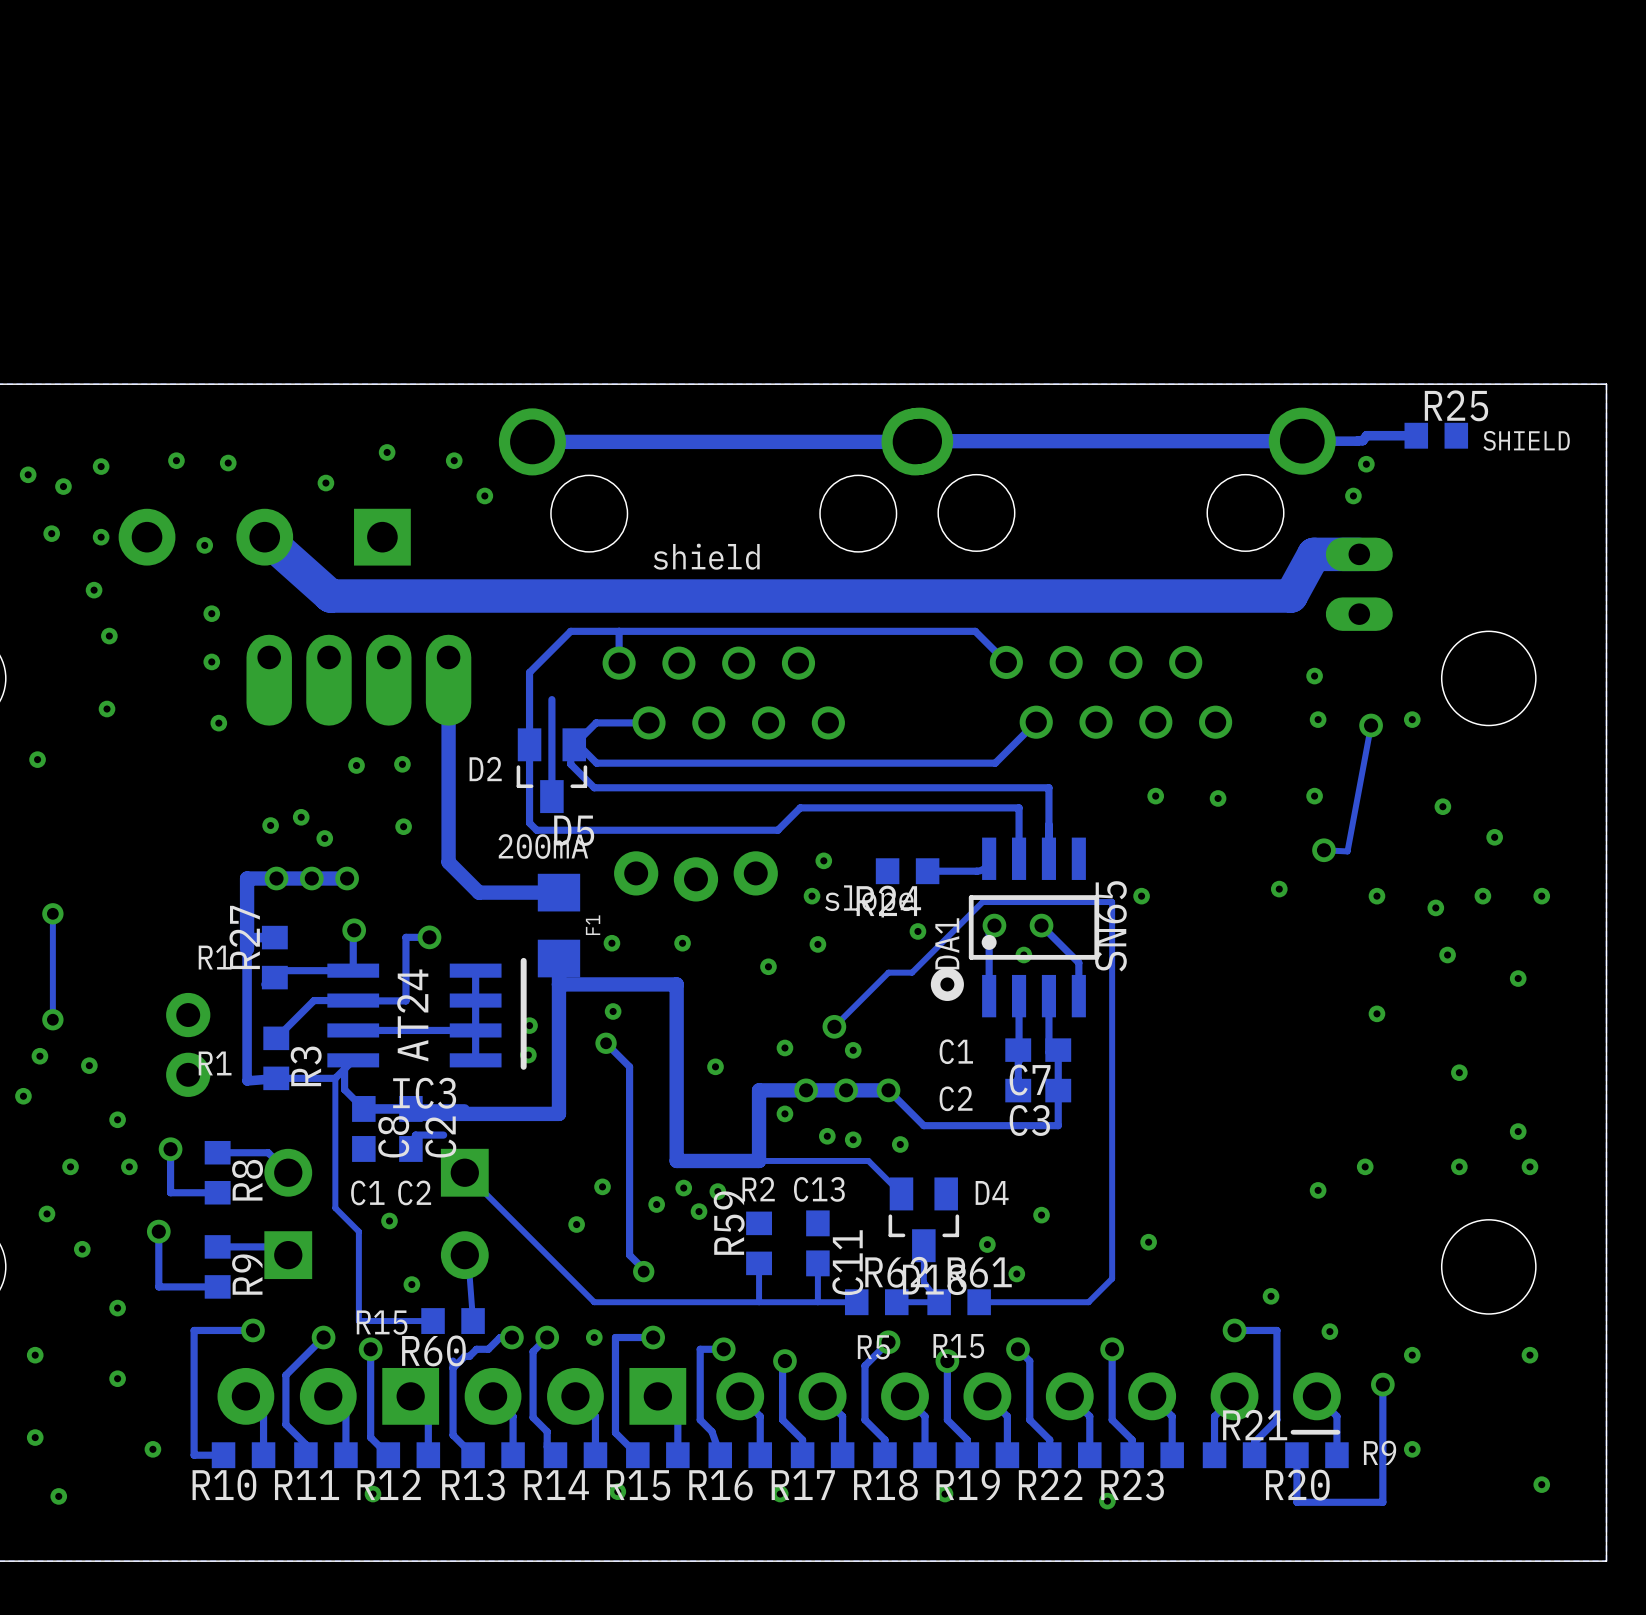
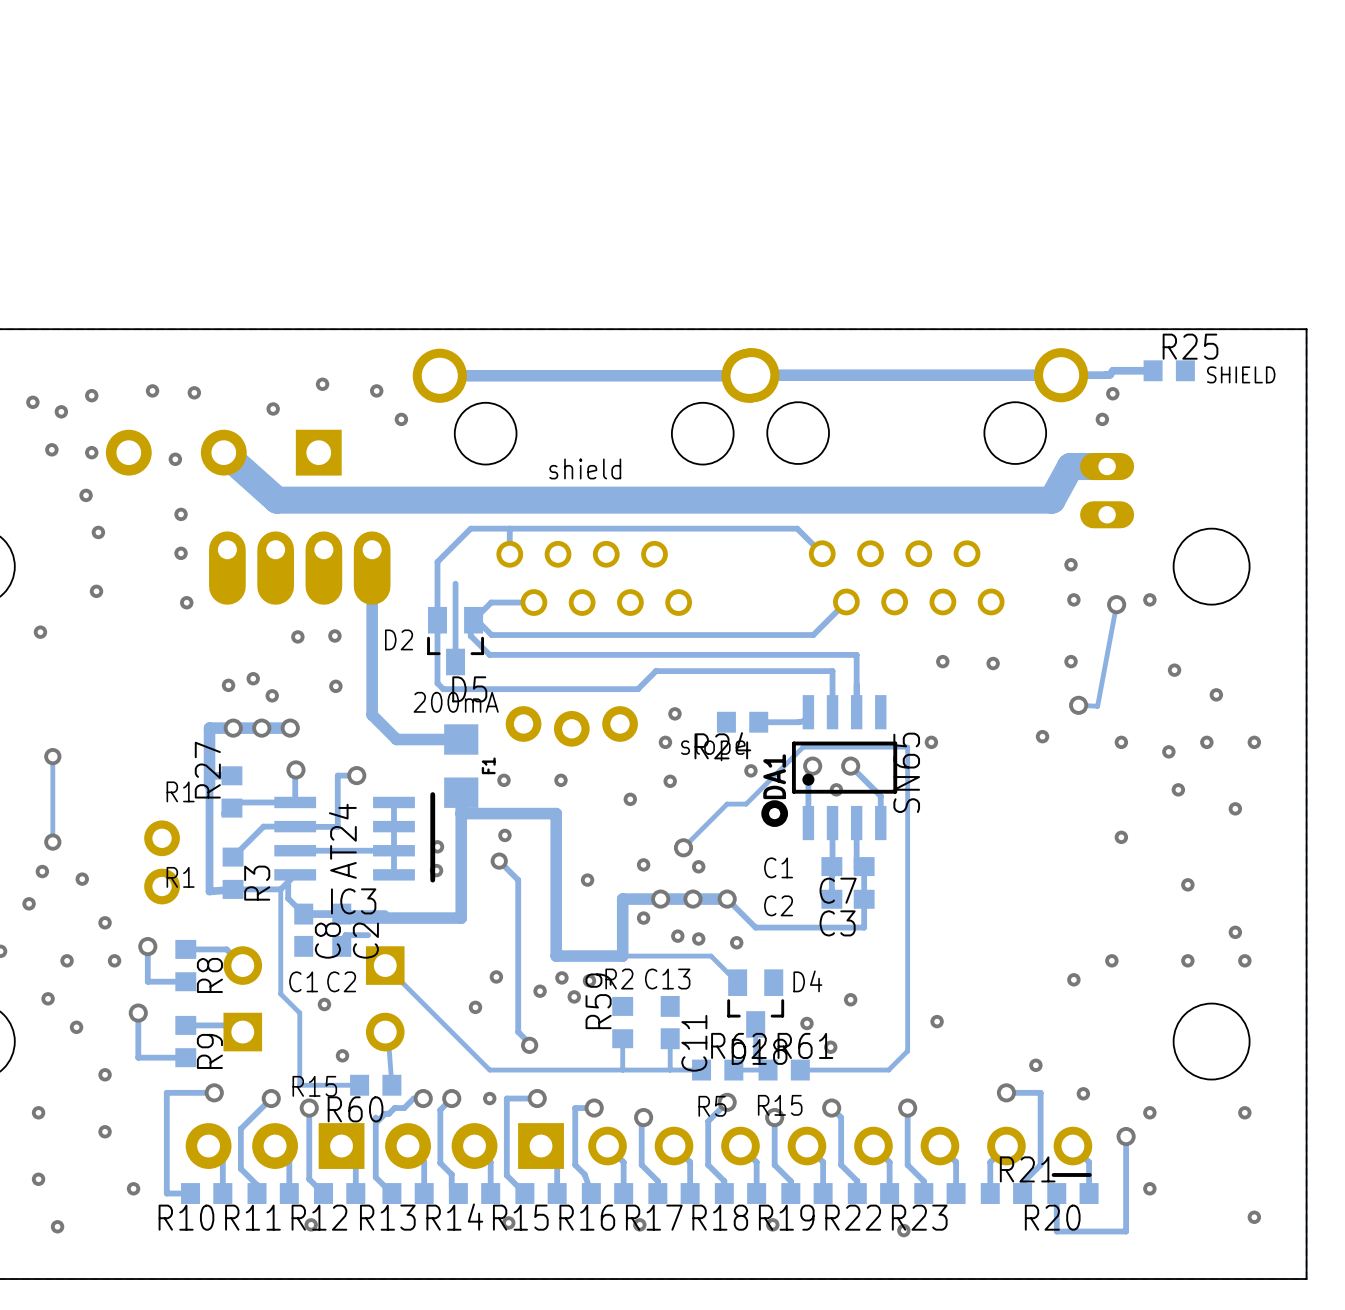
text: R9 (1380, 1452) -> none

